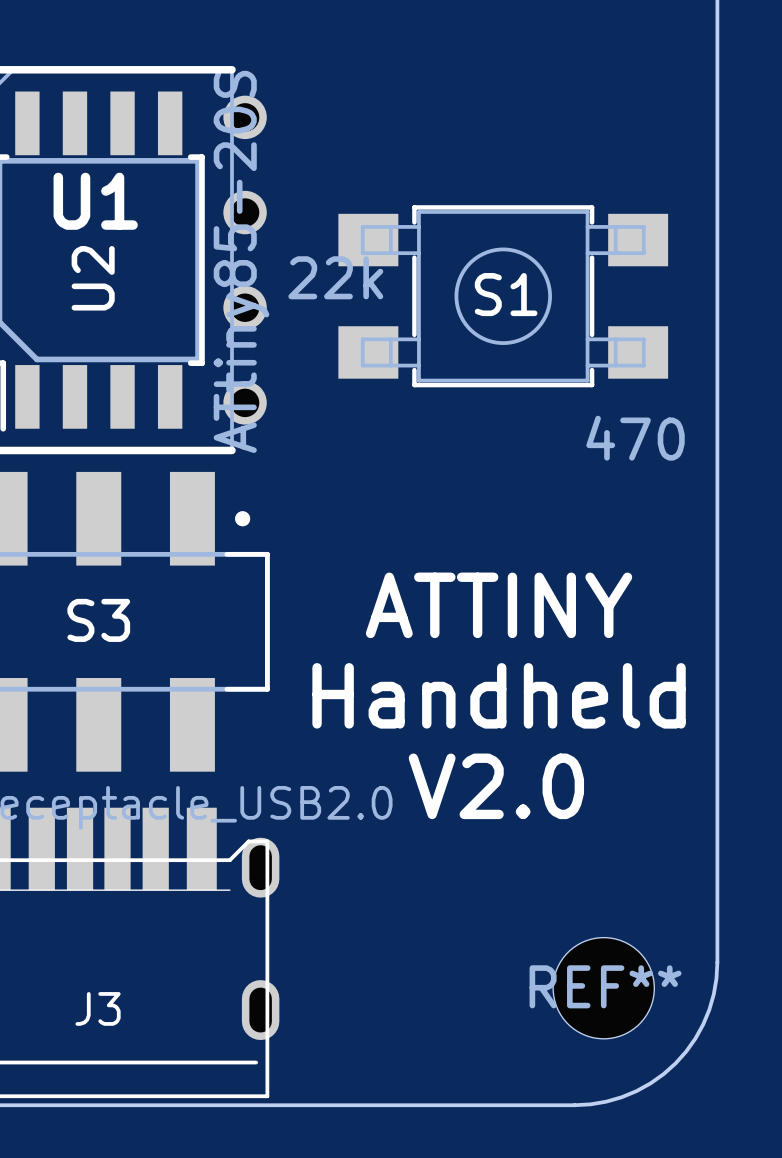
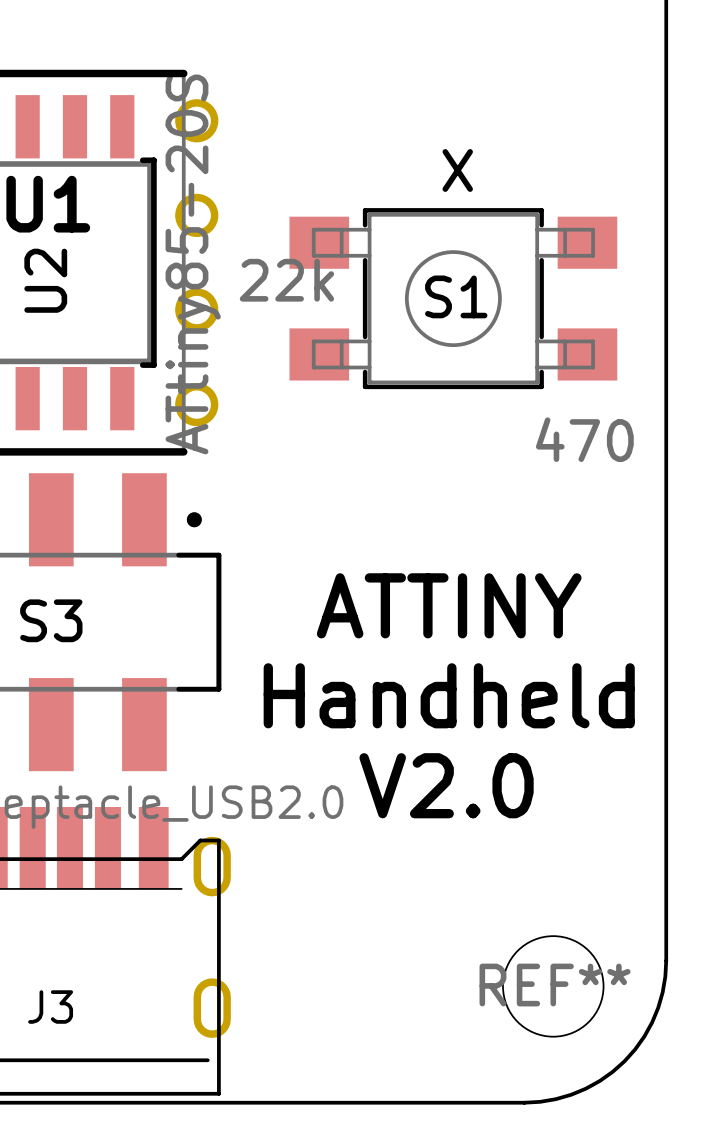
text: none -> X (457, 170)

